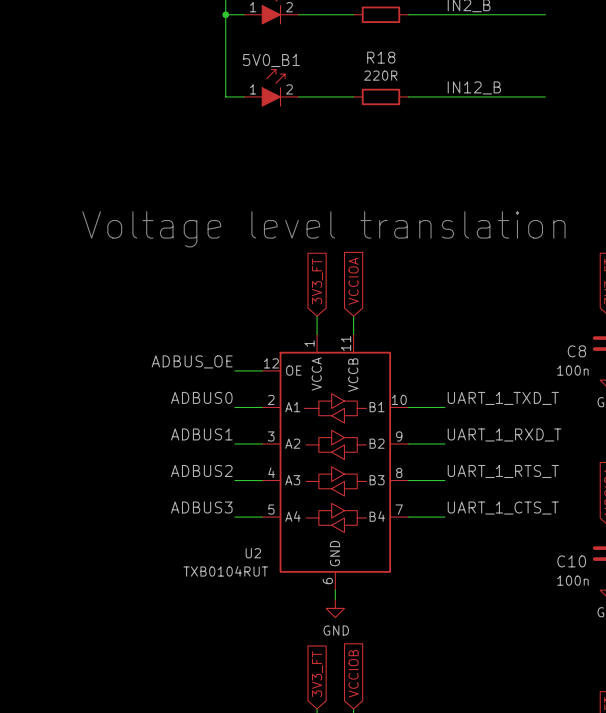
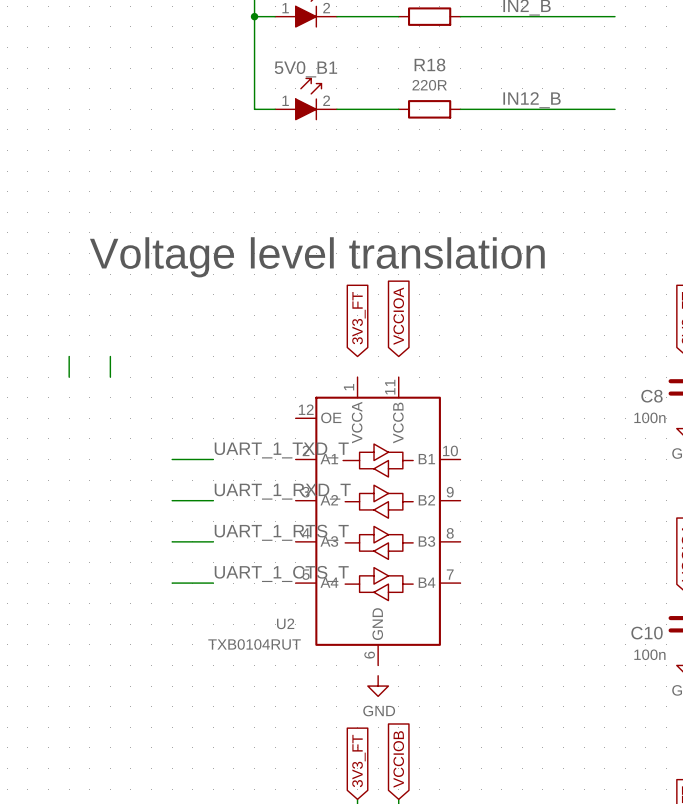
wire: none -> (69, 356) (69, 377)
wire: none -> (110, 356) (110, 377)
wire: (317, 316) (317, 334) -> none
wire: (353, 316) (353, 334) -> none
label: ADBUS_OE (192, 361) -> none
wire: (234, 370) (262, 370) -> none
label: ADBUS0 (201, 397) -> none
label: none -> UART_1_TXD_T (281, 450)
label: UART_1_TXD_T (503, 398) -> none
wire: none -> (172, 459) (213, 459)
wire: (234, 407) (262, 407) -> none
wire: (408, 407) (444, 407) -> none
label: ADBUS1 (201, 434) -> none
label: none -> UART_1_RXD_T (282, 491)
label: UART_1_RXD_T (504, 434) -> none
wire: none -> (172, 500) (213, 500)
wire: (234, 444) (262, 444) -> none
wire: (408, 444) (444, 444) -> none
label: ADBUS2 (201, 470) -> none
label: none -> UART_1_RTS_T (281, 532)
label: UART_1_RTS_T (503, 471) -> none
wire: none -> (172, 541) (213, 541)
wire: (234, 480) (262, 480) -> none
wire: (408, 480) (444, 480) -> none
label: ADBUS3 (201, 507) -> none
label: none -> UART_1_CTS_T (281, 573)
label: UART_1_CTS_T (503, 508) -> none
wire: none -> (172, 583) (213, 583)
wire: (234, 517) (262, 517) -> none
wire: (408, 517) (444, 517) -> none
wire: (335, 590) (335, 599) -> none

